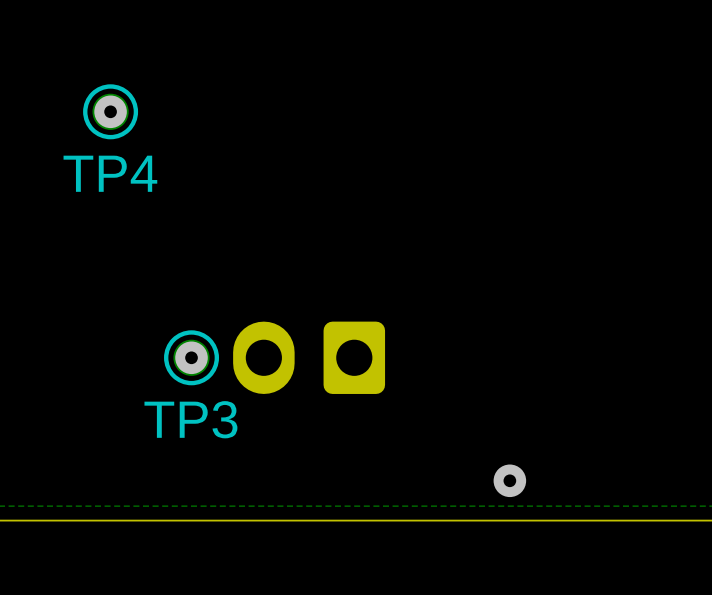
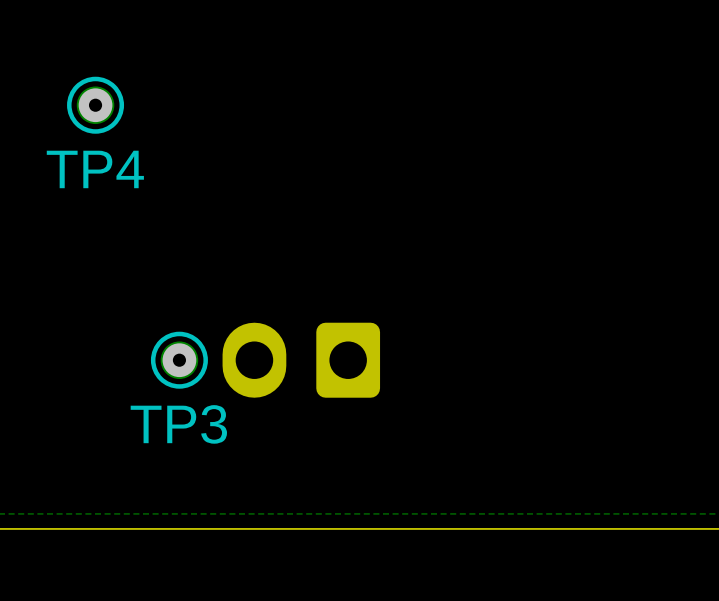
via: (509, 480) -> none

